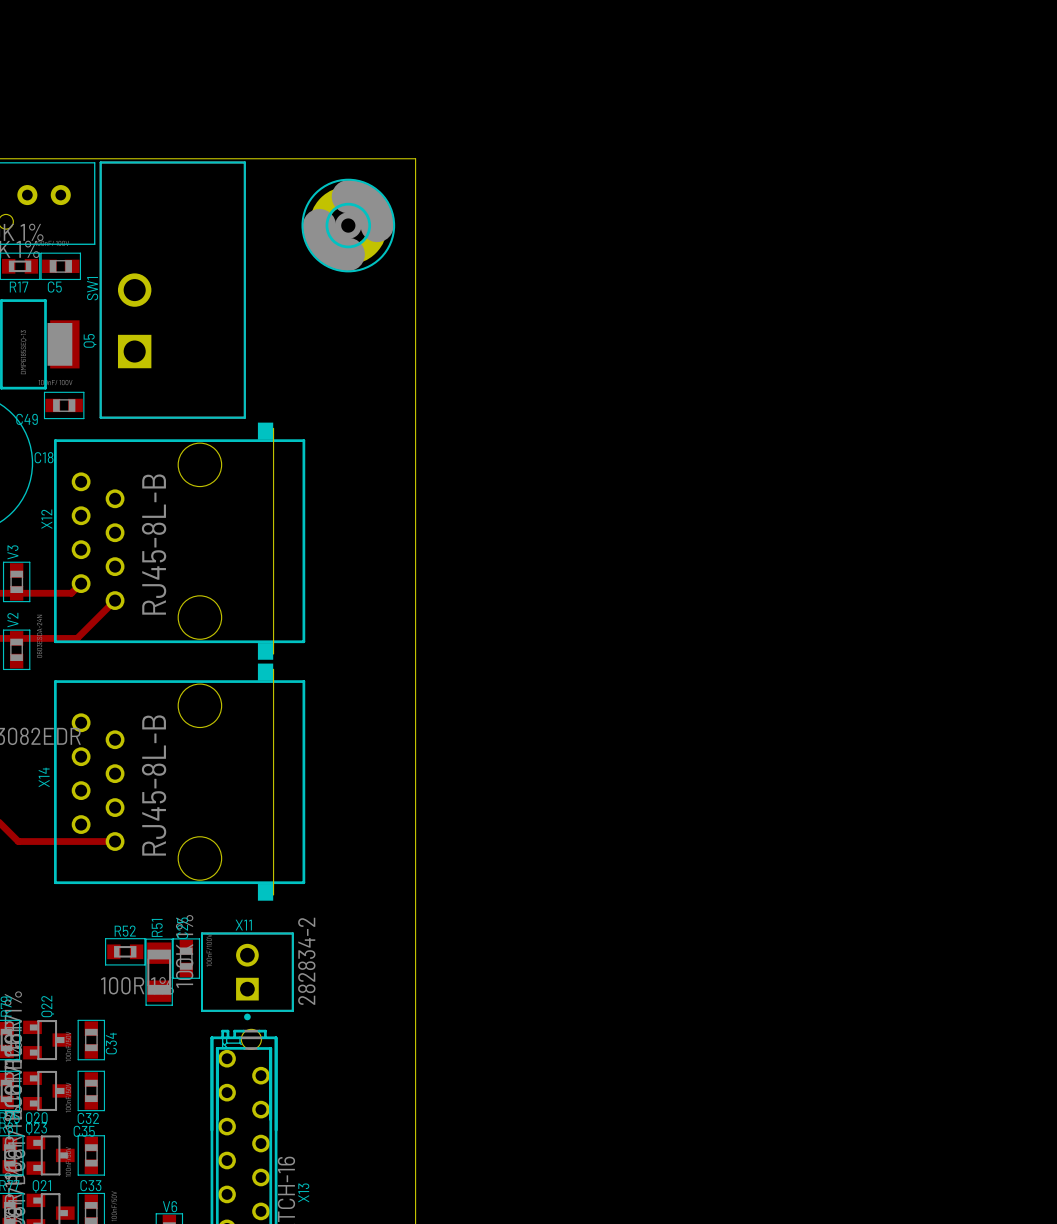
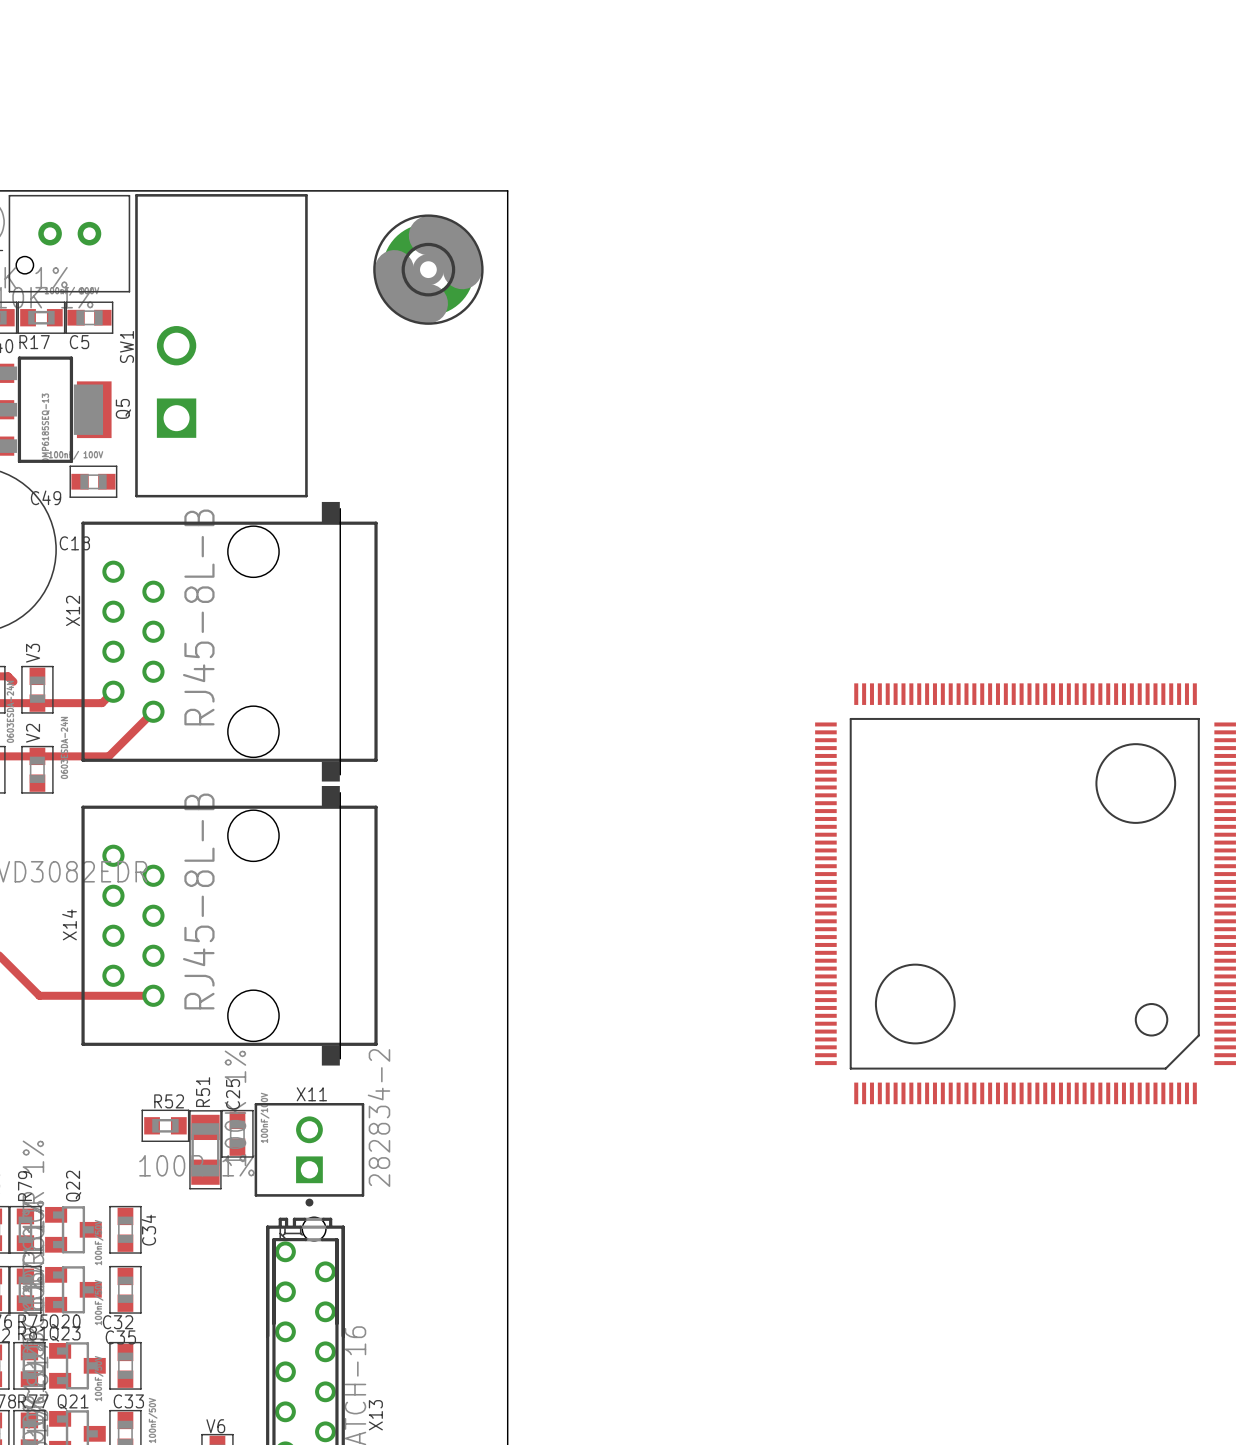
part: none -> (1025, 893)

